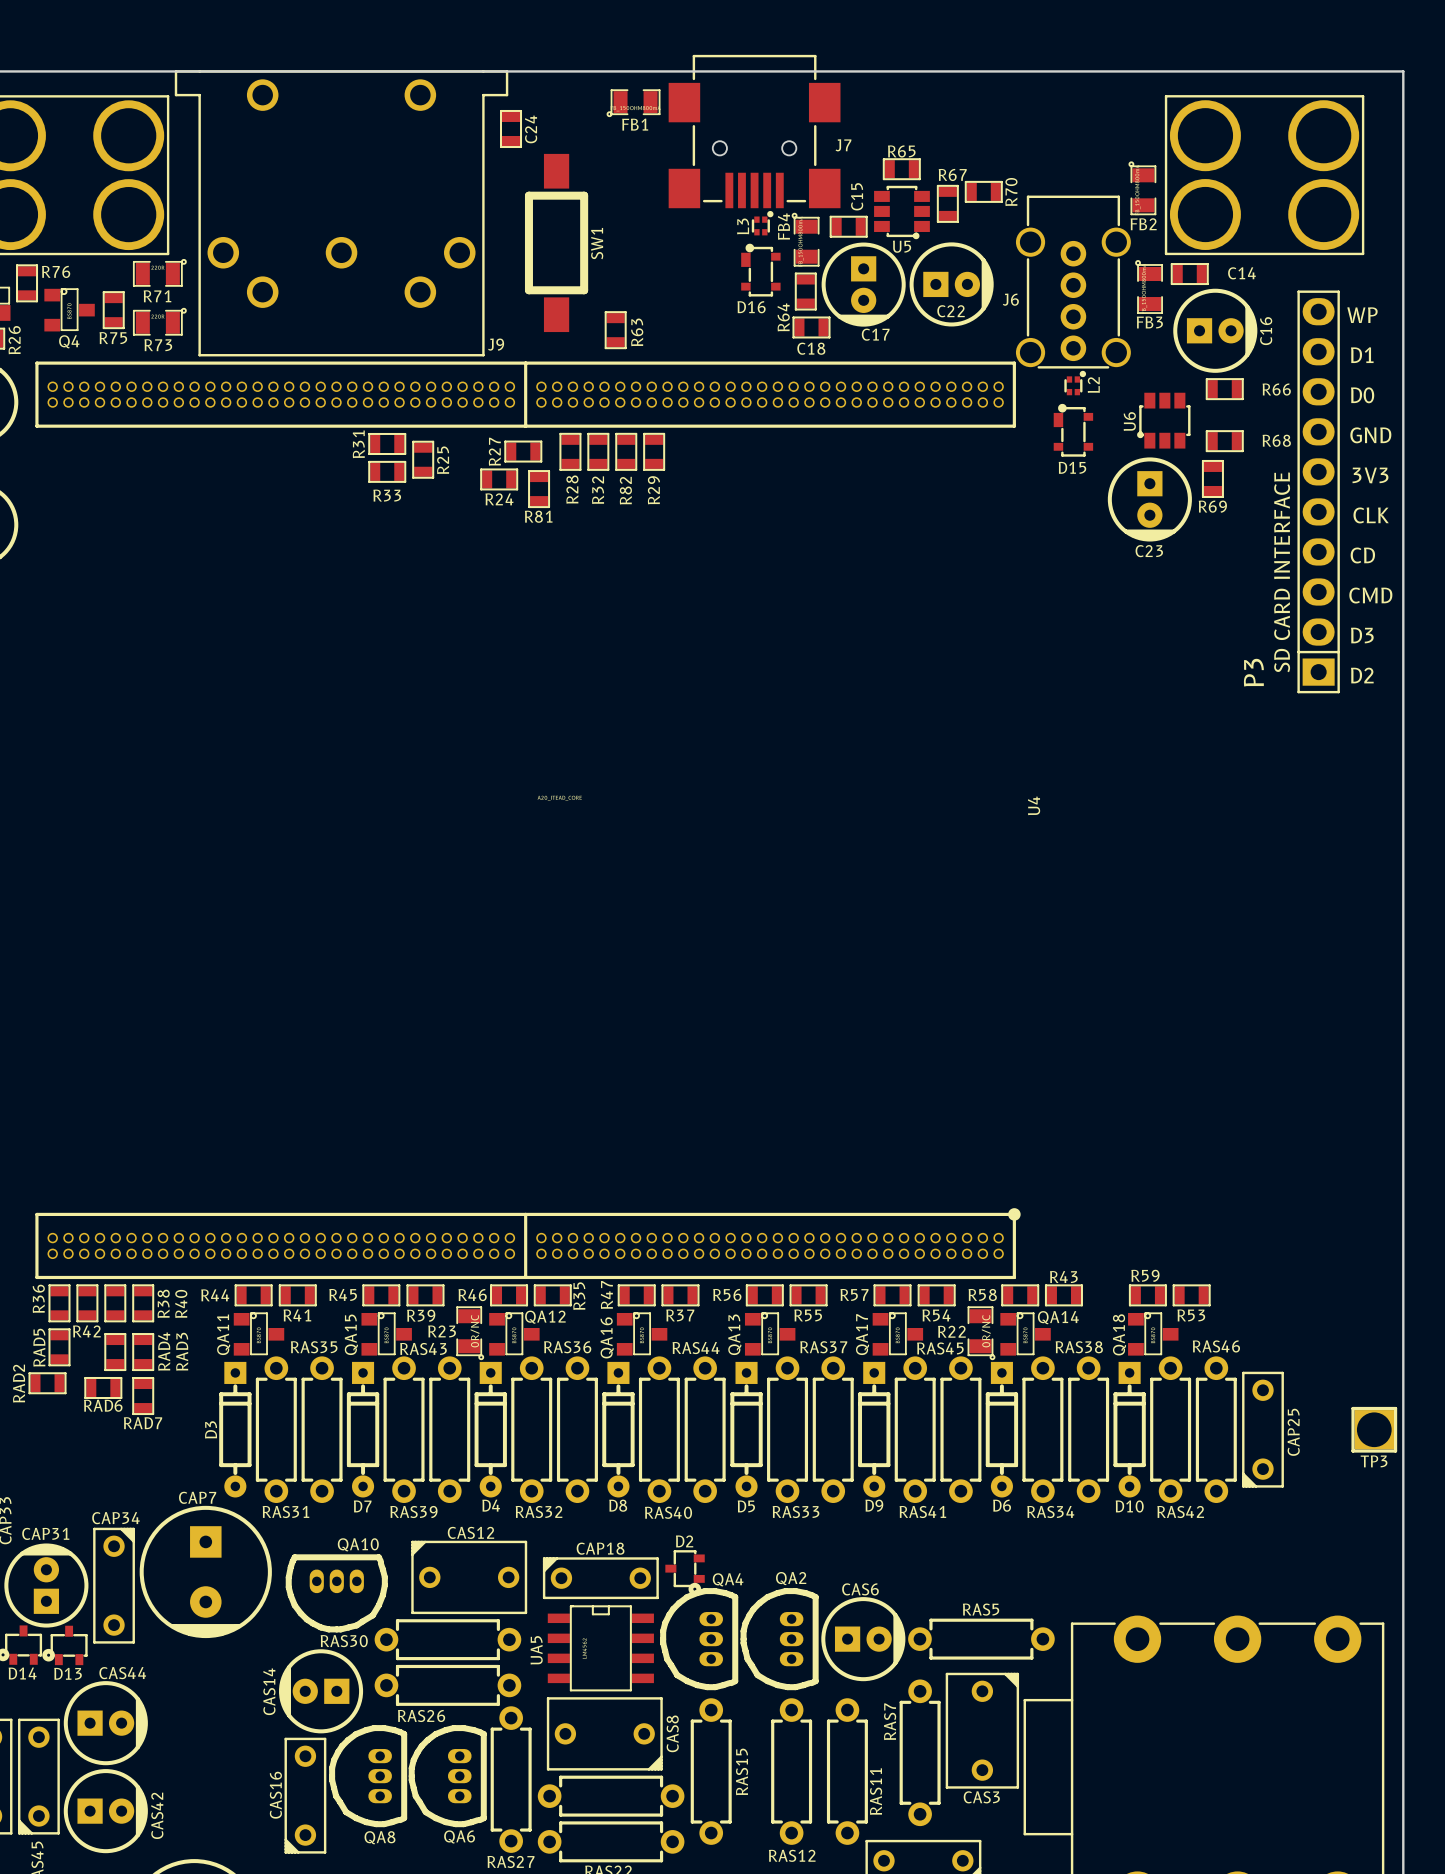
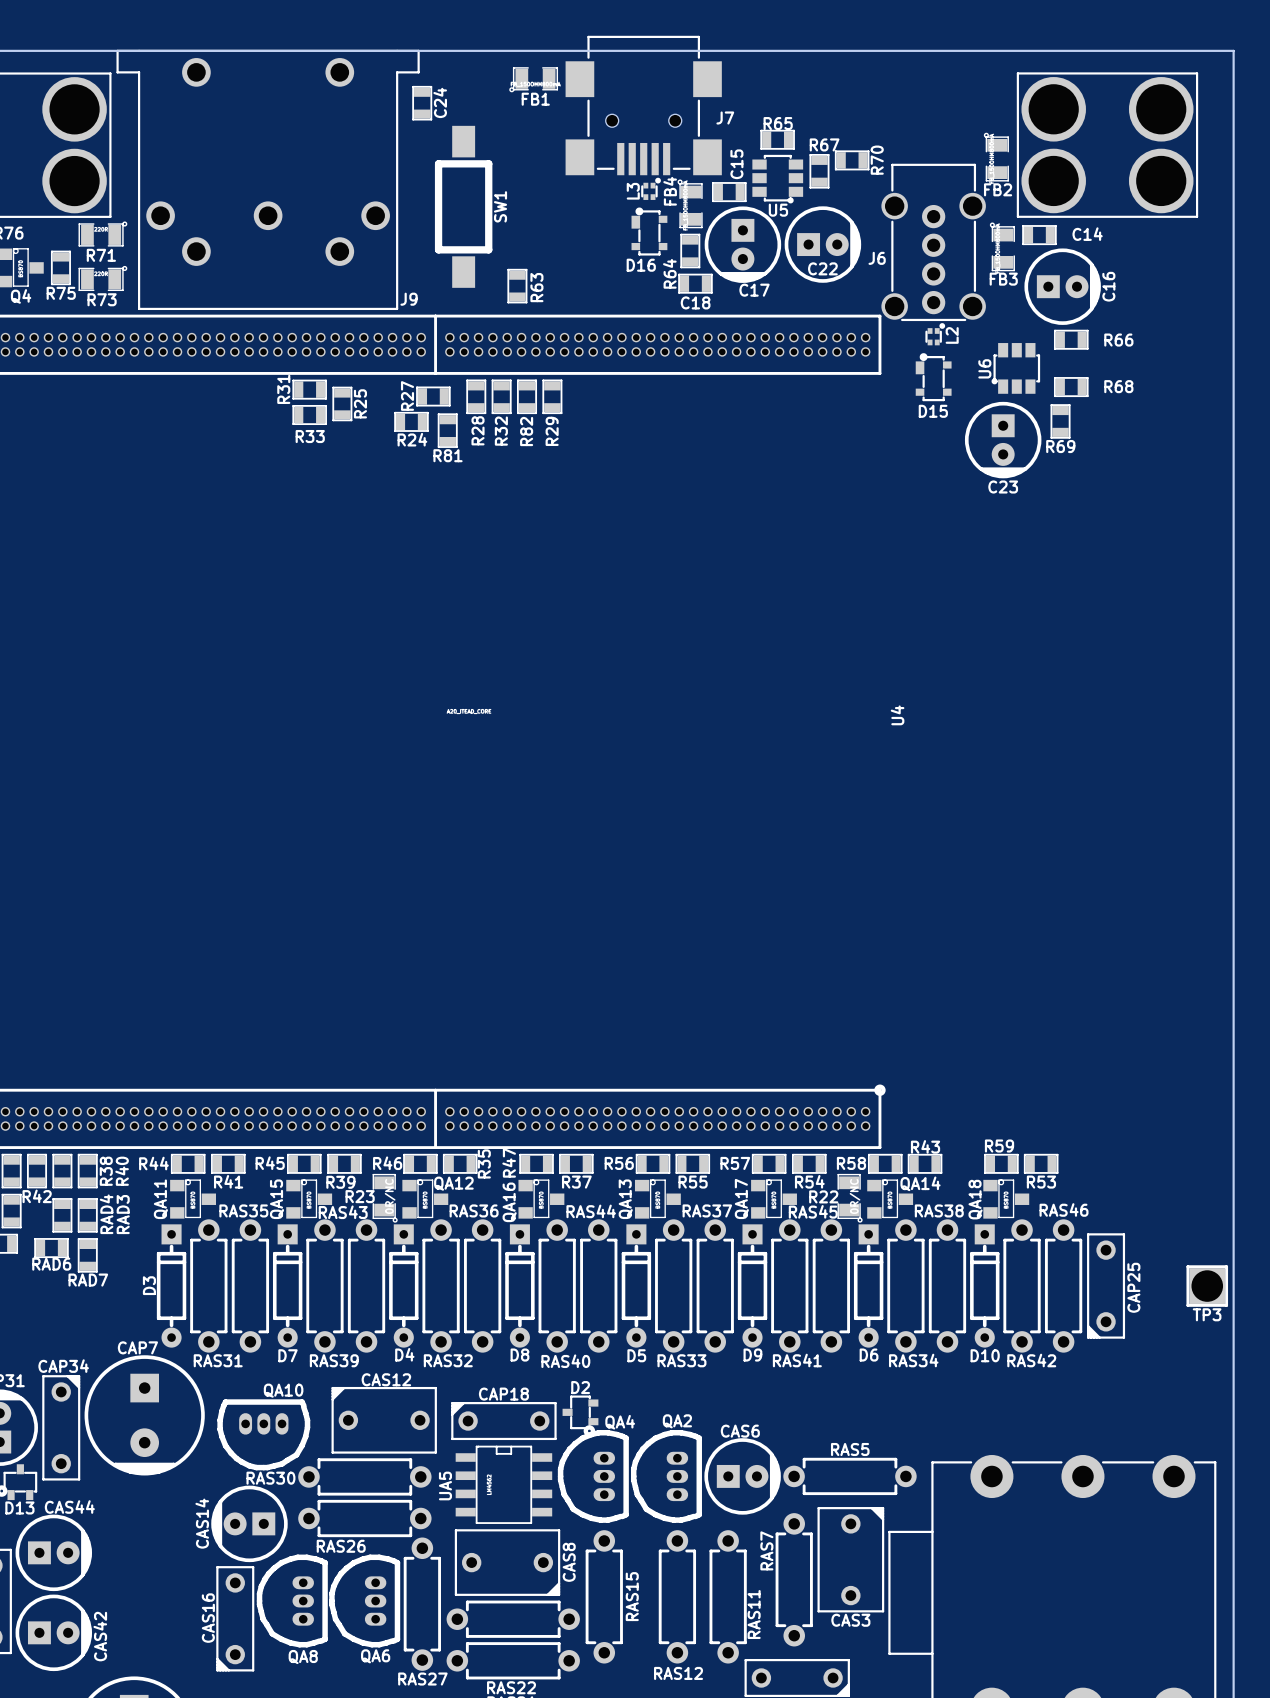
text: WP (1362, 315) -> none
text: D1 (1362, 355) -> none
text: D0 (1362, 395) -> none
text: GND (1370, 435) -> none
text: 3V3 (1370, 475) -> none
P3: (1318, 491) -> none
text: CLK (1371, 515) -> none
text: CD (1362, 555) -> none
text: SD CARD INTERFACE (1282, 572) -> none
text: CMD (1370, 595) -> none
text: D3 (1362, 635) -> none
text: D2 (1362, 675) -> none

